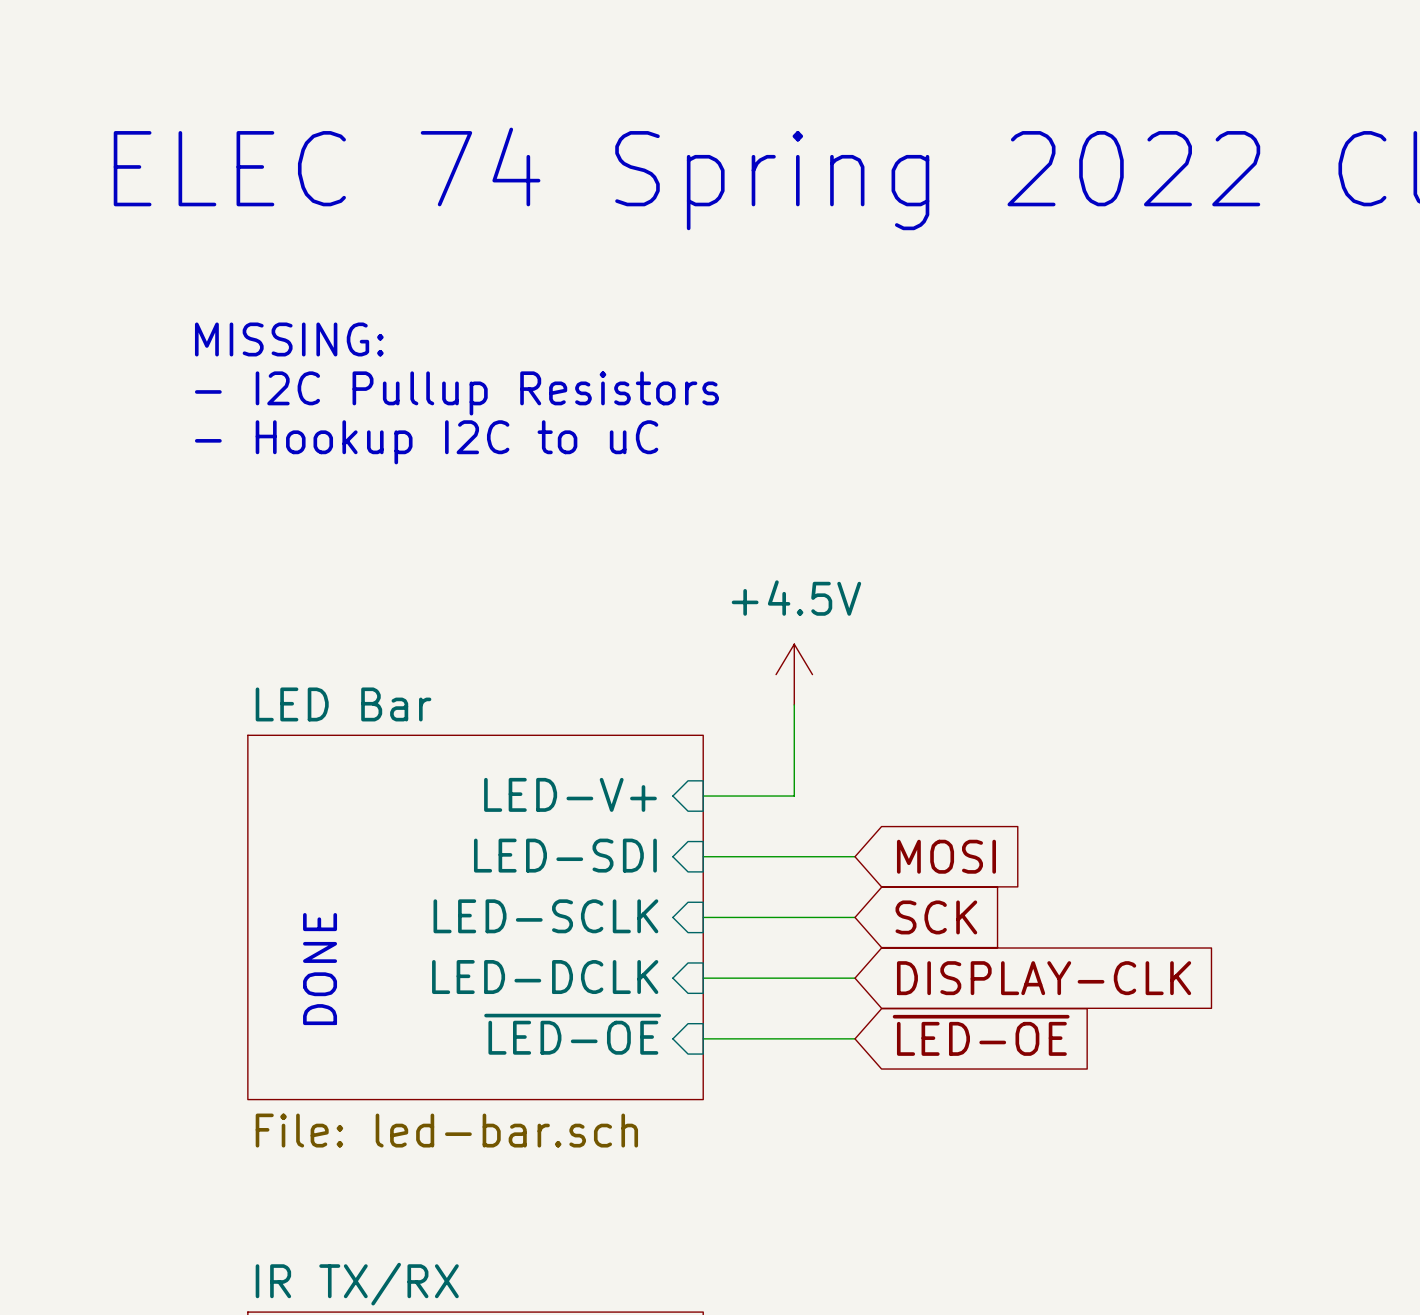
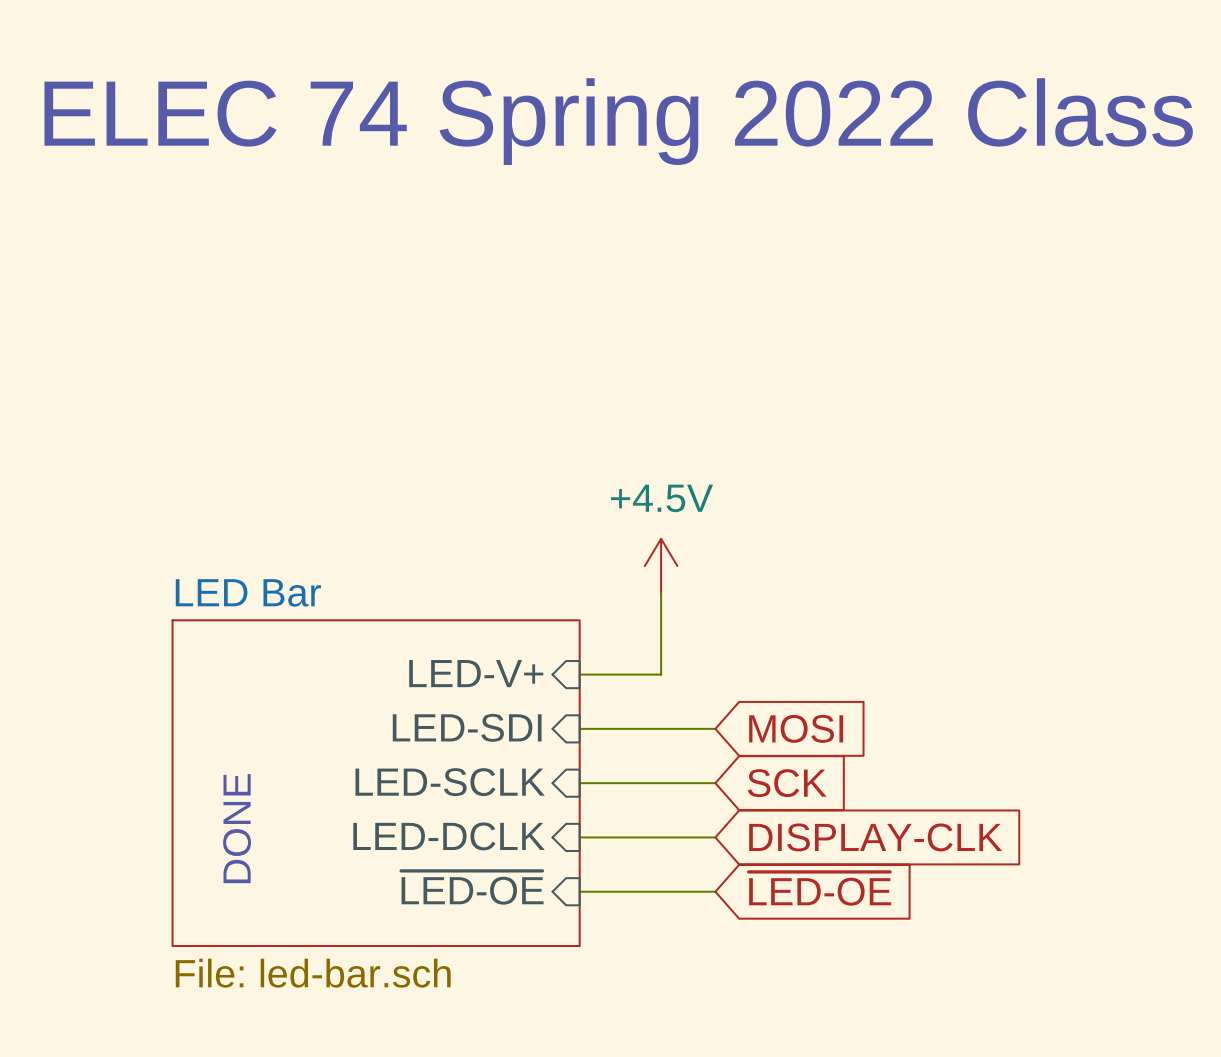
text: MISSING: (289, 339) -> none
text: - I2C Pullup Resistors (456, 393) -> none
text: - Hookup I2C to uC (426, 442) -> none

